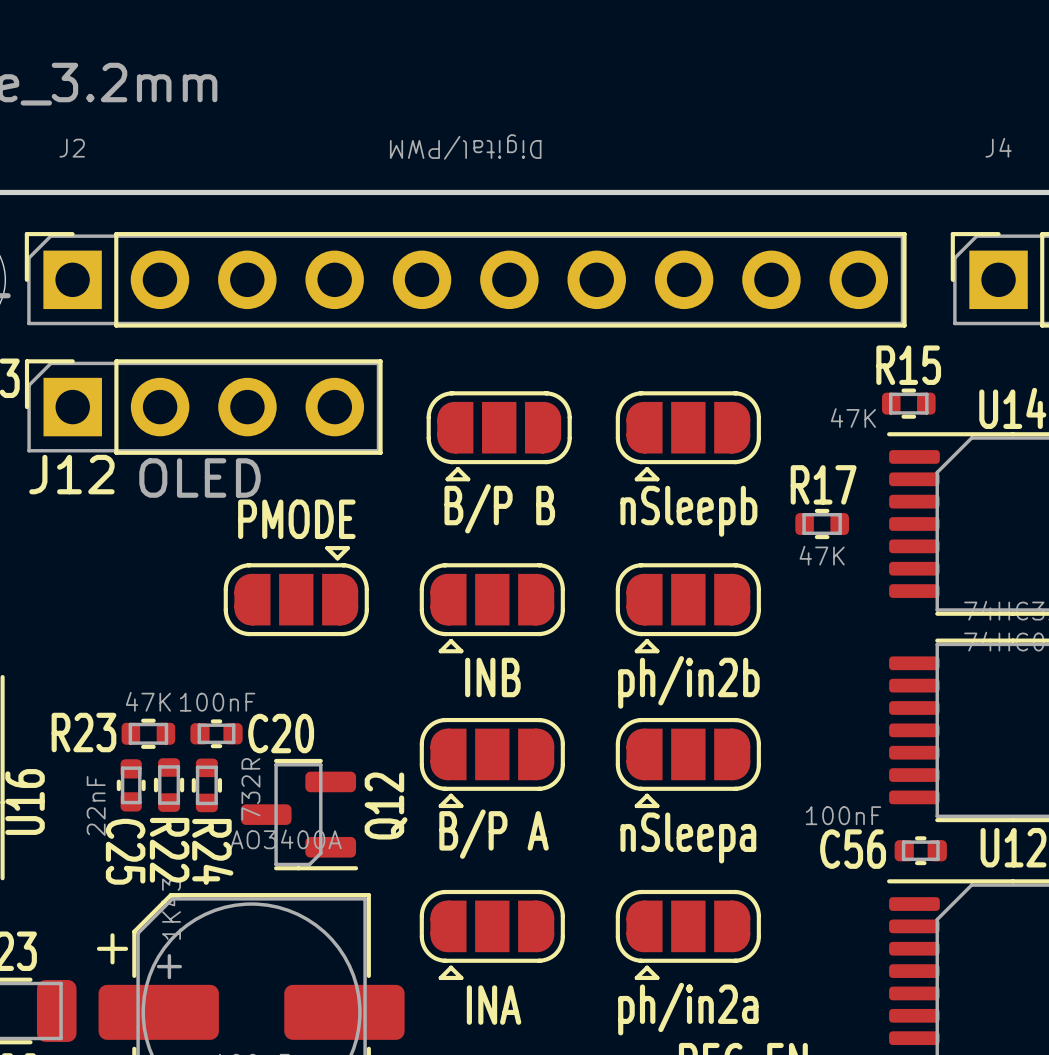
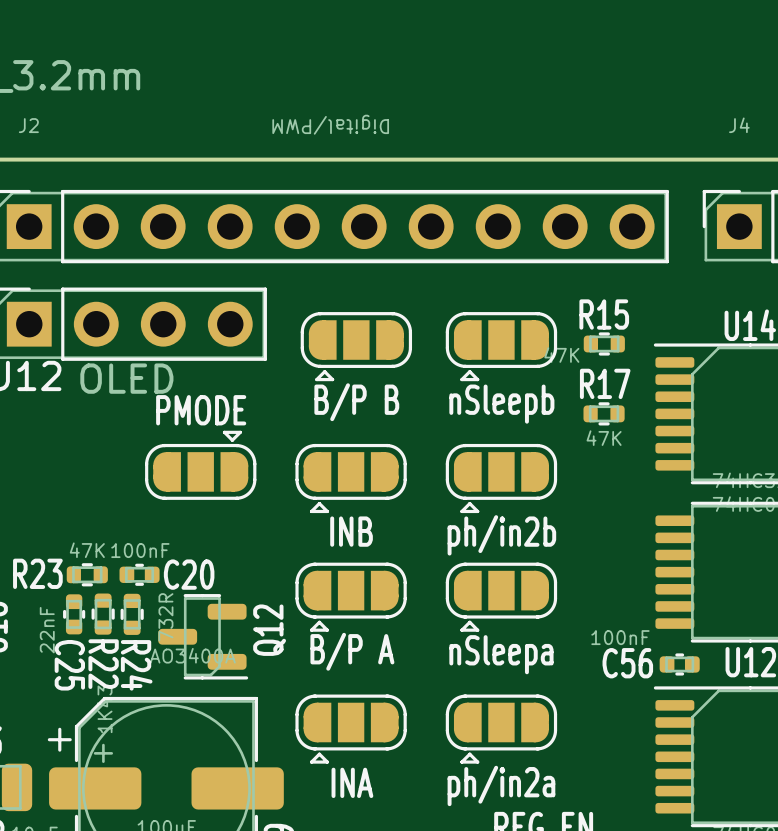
R15 position: (908, 403) -> (604, 343)

